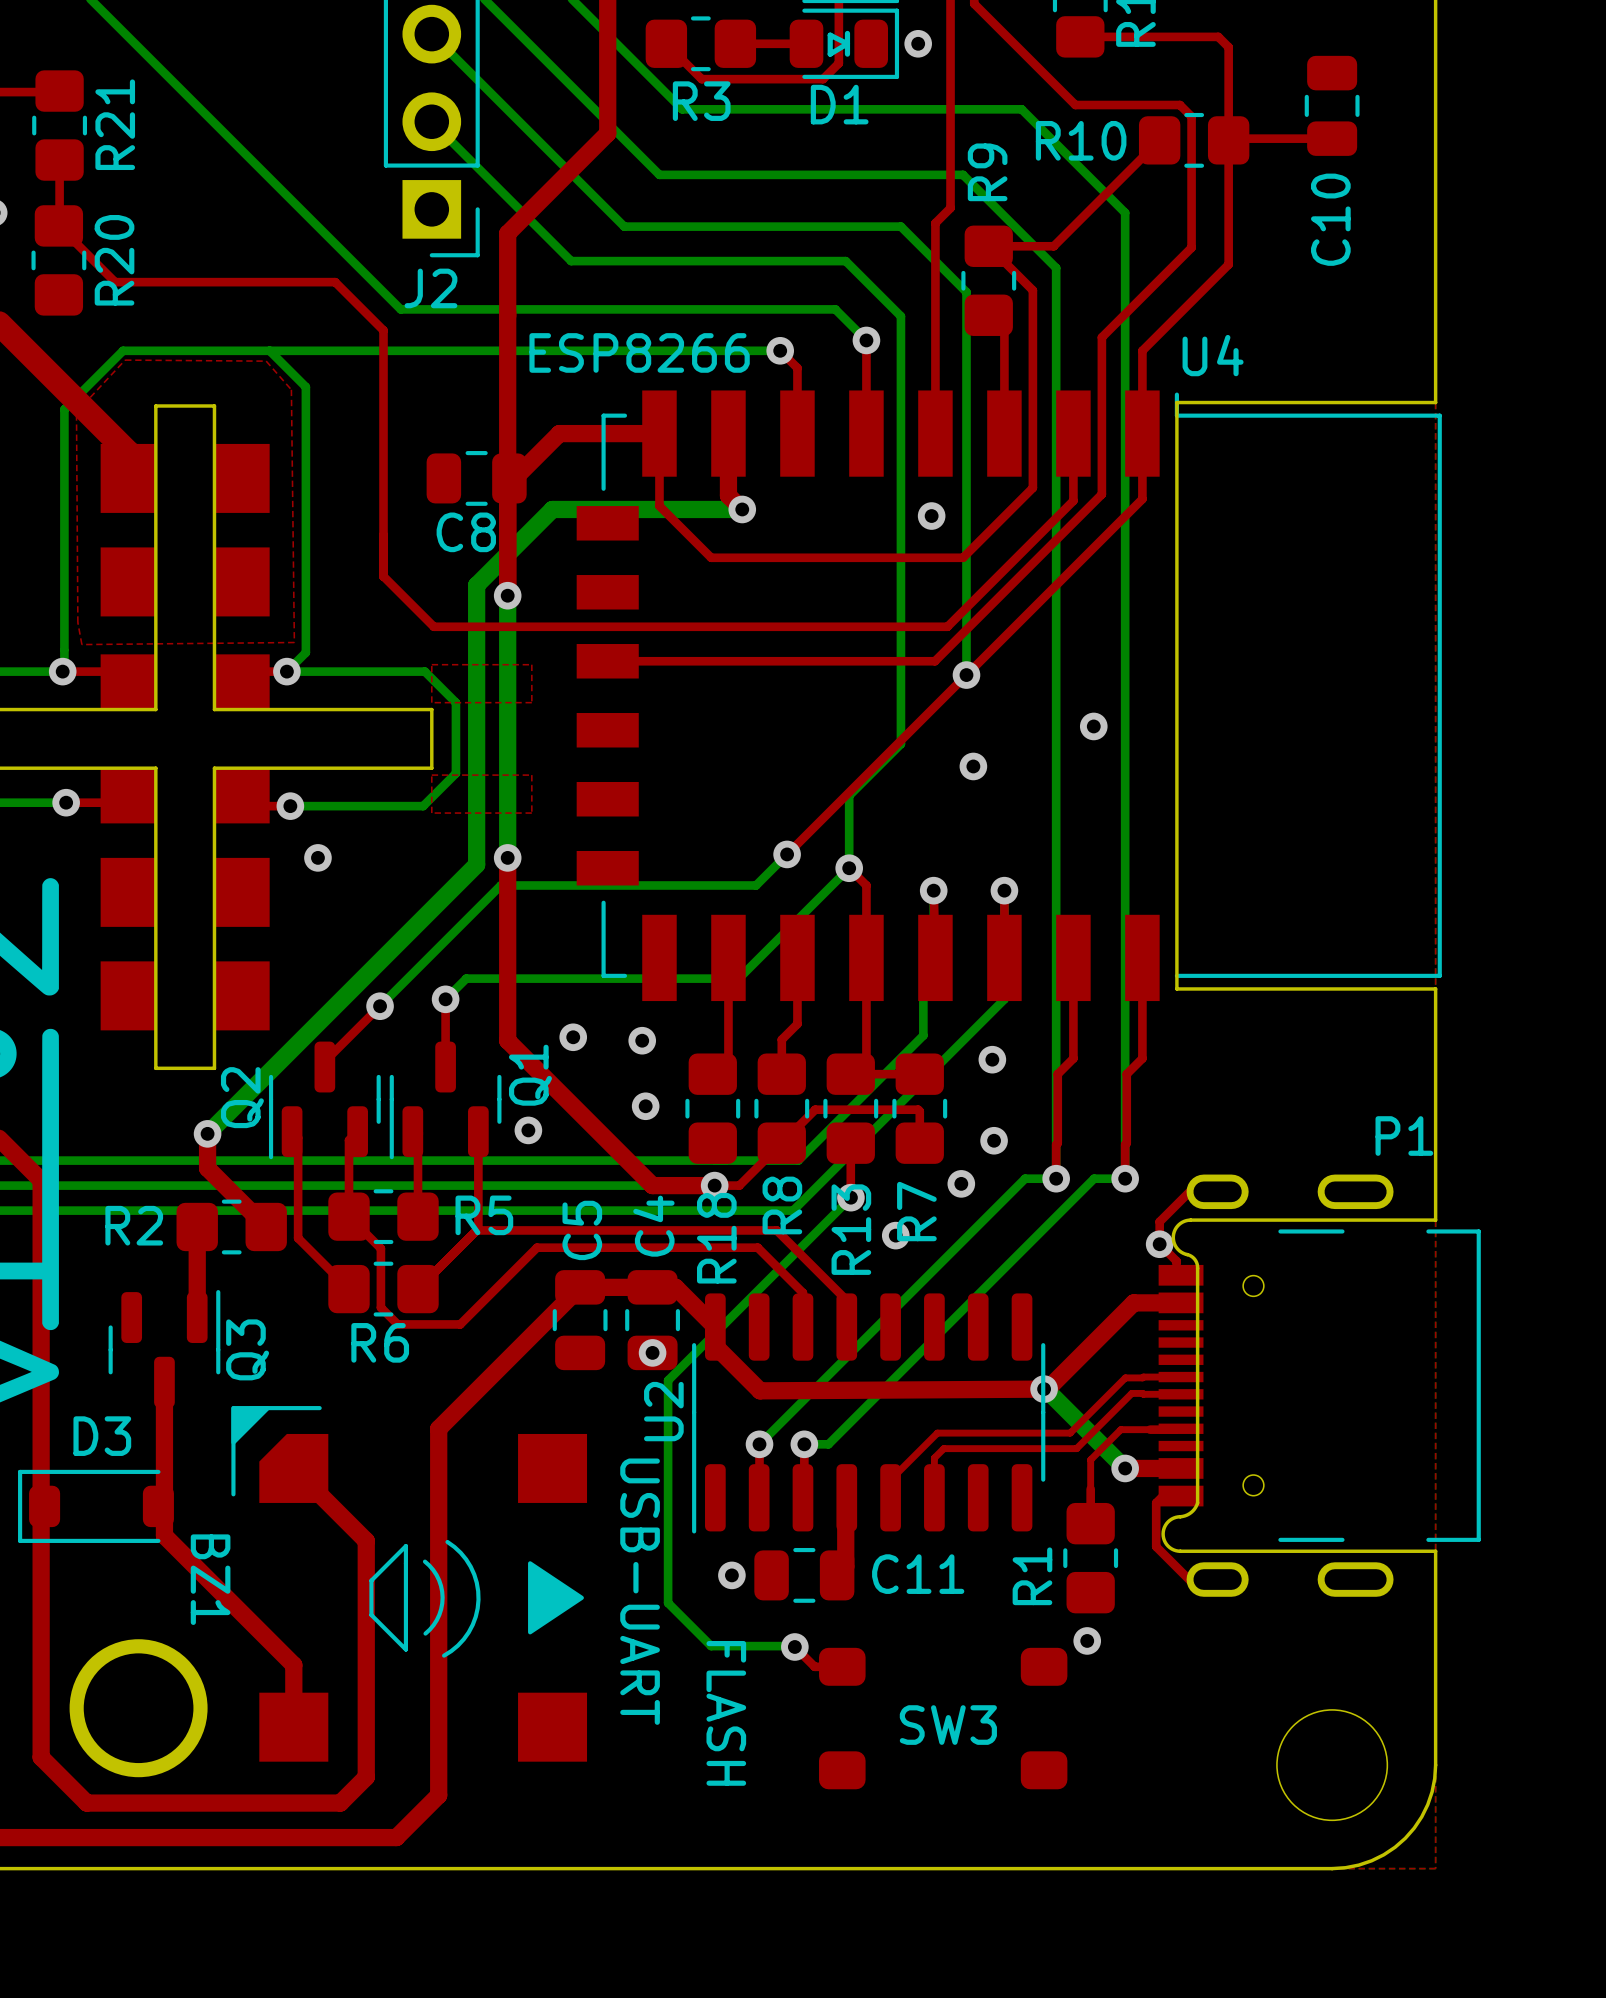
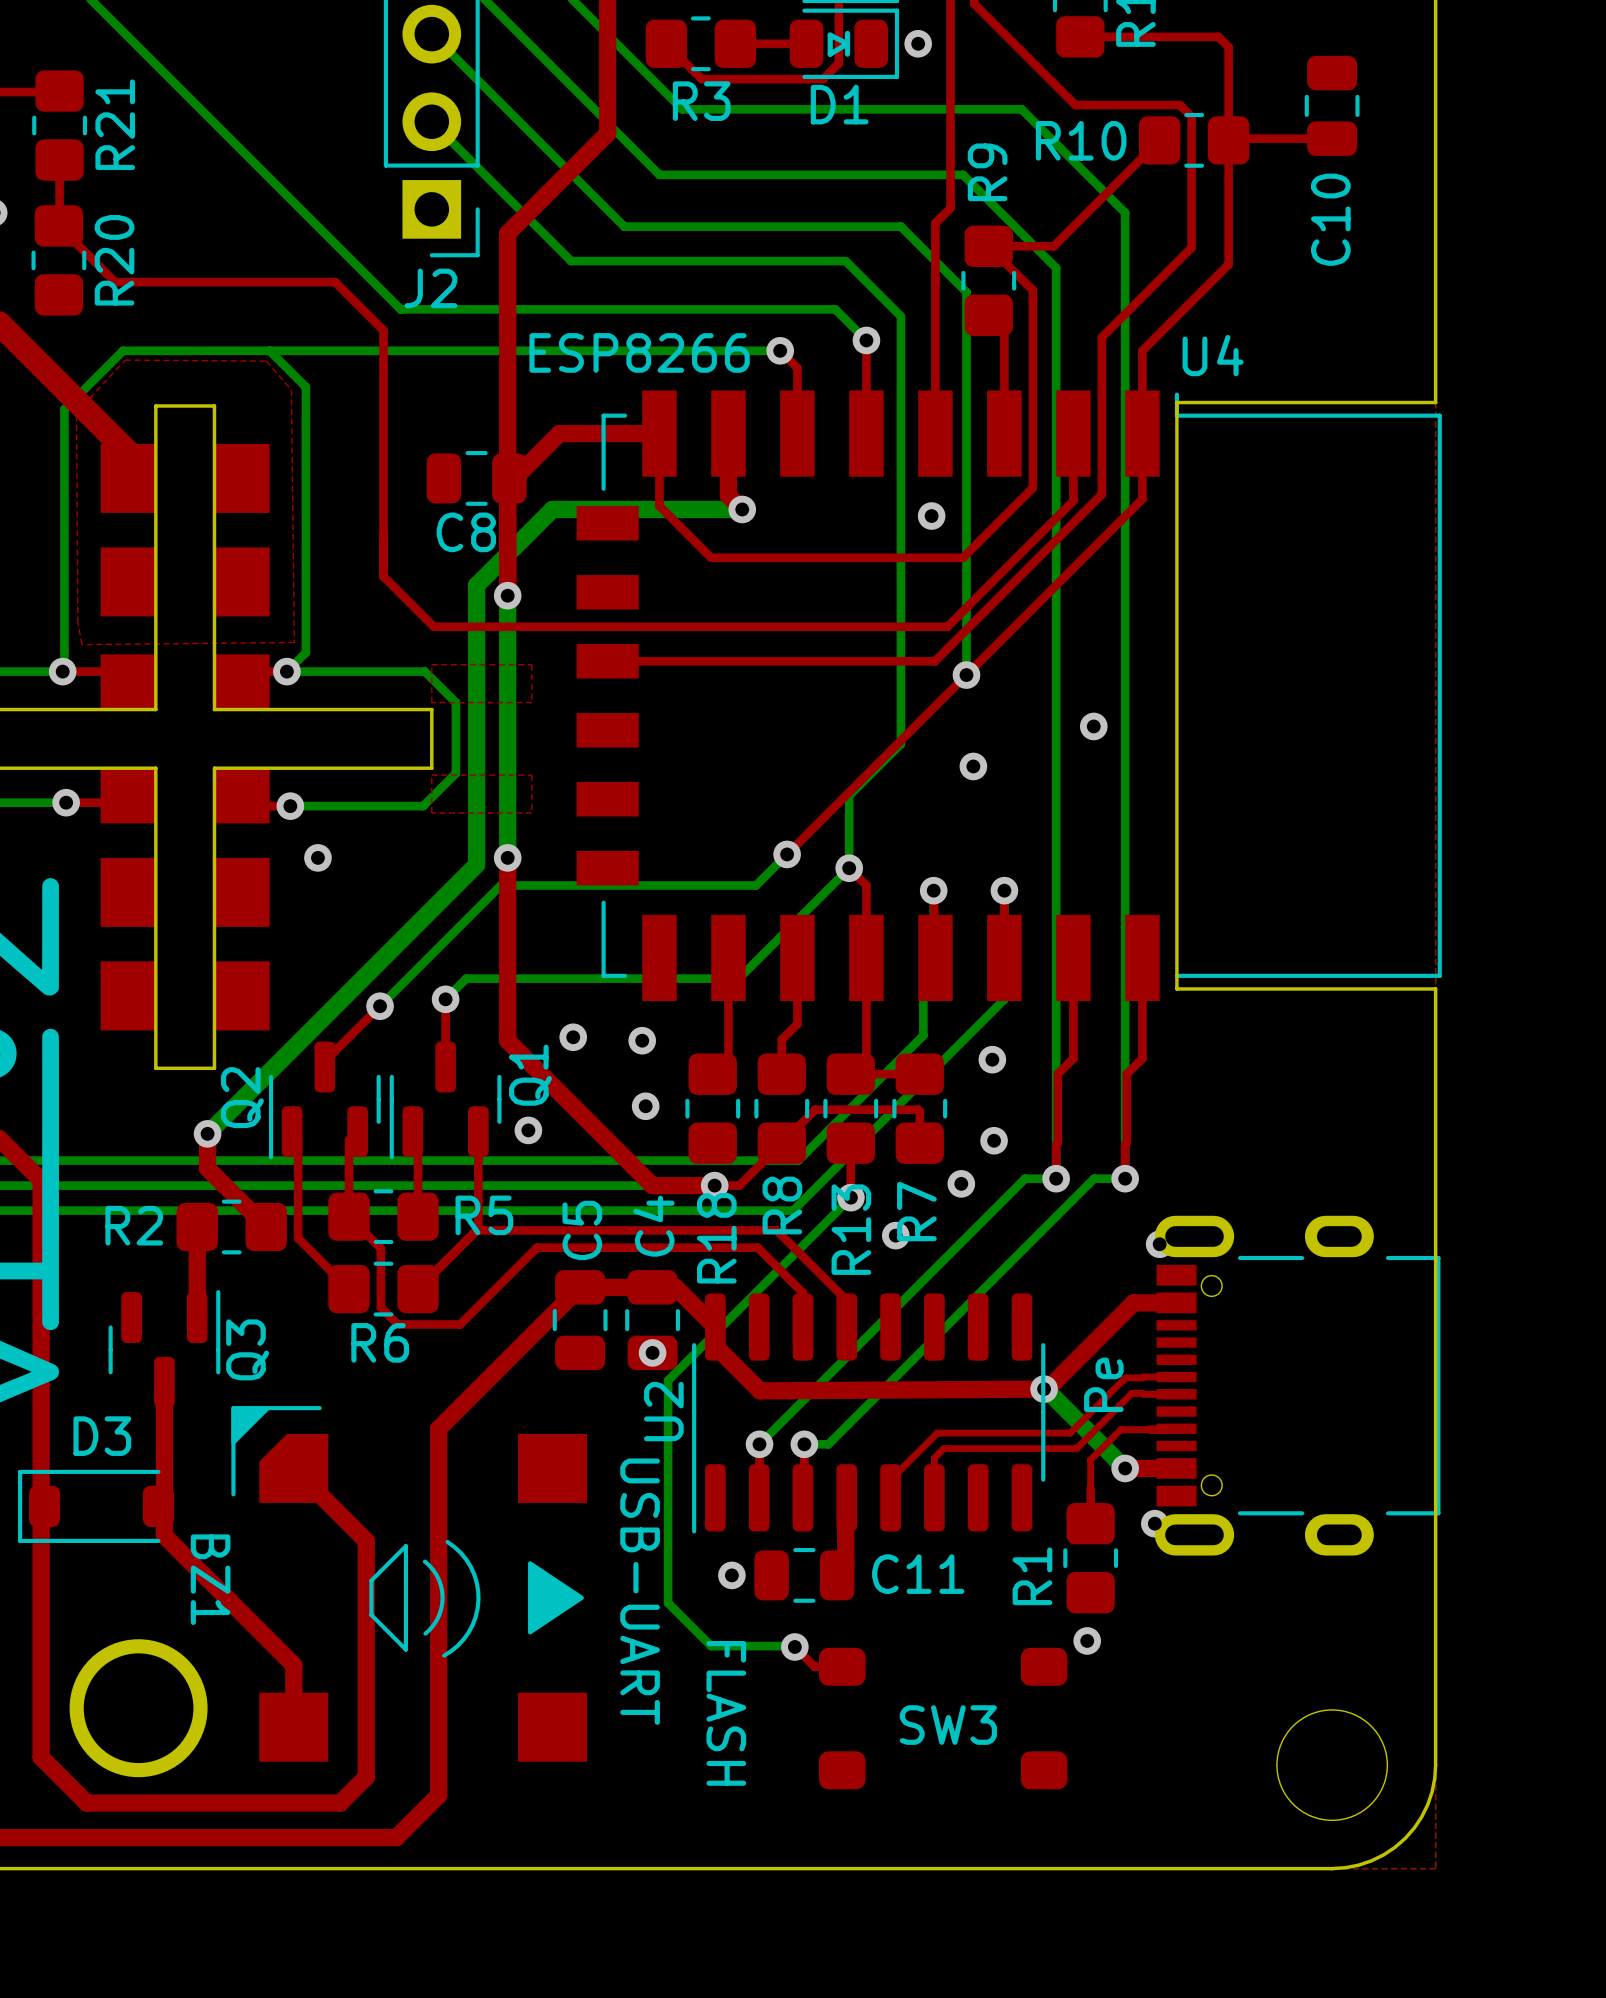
top track: (1192, 1188) (1159, 1221) (1159, 1244) (1176, 1261) (1176, 1275) -> none
board edge: (1435, 1220) (1190, 1220) (1184, 1221) (1177, 1226) (1173, 1235) (1175, 1246) (1181, 1252) (1193, 1258) (1197, 1266) (1197, 1502) (1189, 1513) (1173, 1518) (1168, 1521) (1163, 1534) (1168, 1546) (1180, 1551) (1435, 1551) -> (1435, 1220) (1435, 1551)
Pe: none -> (1297, 1385)
P1: (1319, 1385) -> none
top track: (1176, 1496) (1163, 1496) (1156, 1502) (1156, 1546) (1192, 1583) -> none
via: none -> (1154, 1523)

